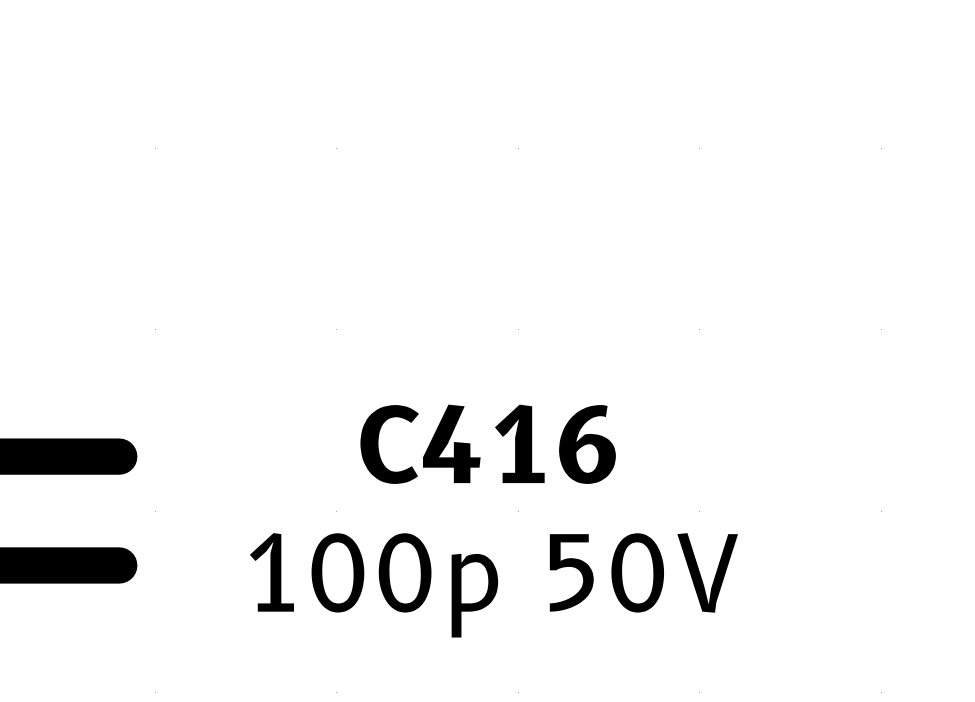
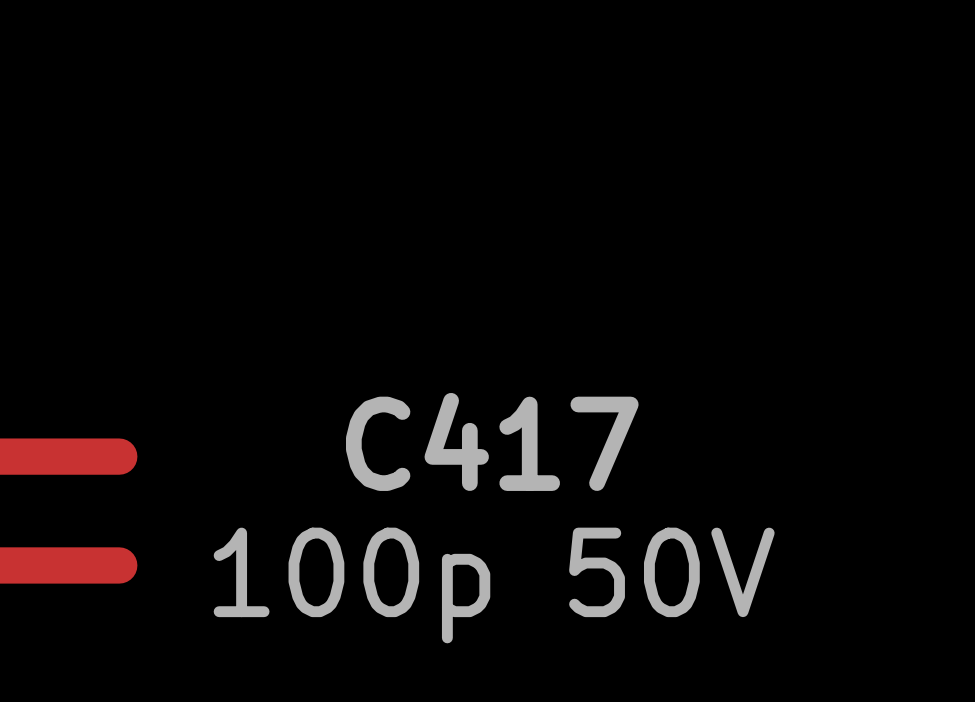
C416 name: C416 (488, 444) -> C417 (492, 441)

